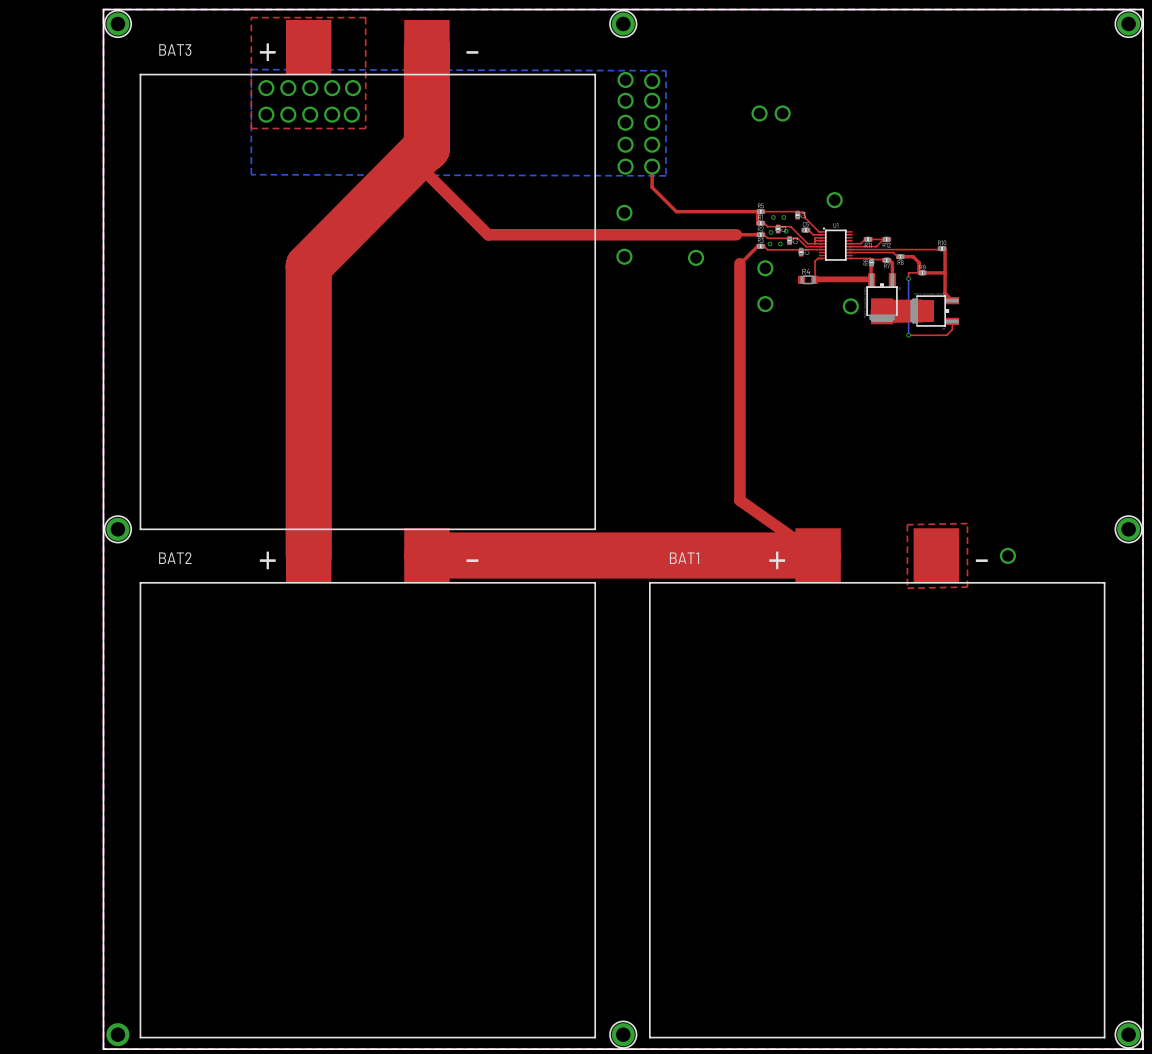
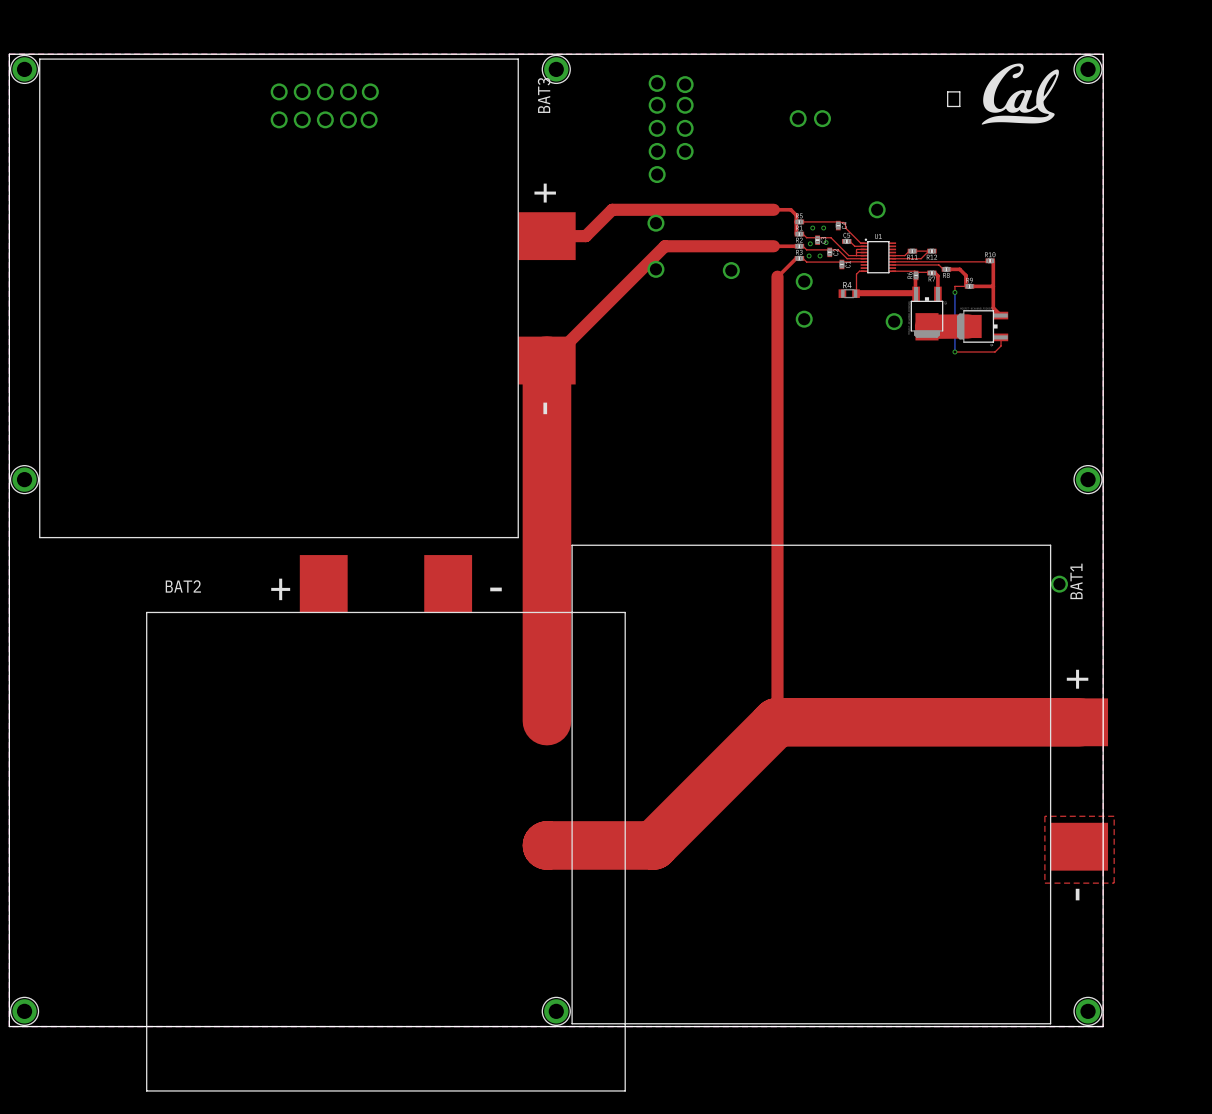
board edge: (103, 9) (1143, 9) (1142, 1049) (103, 1049) (103, 9) -> (9, 54) (9, 1026) (1103, 1026) (1103, 54) (9, 54)
top zone outline: (251, 17) (365, 17) (365, 128) (251, 128) (251, 17) -> none
BAT3 footprint: [140, 19, 596, 530] -> [39, 58, 576, 538]
drawing position: (117, 23) -> (24, 69)
via: (117, 23) -> none
drawing position: (623, 23) -> (556, 69)
via: (623, 23) -> none
drawing position: (1128, 23) -> (1088, 69)
via: (1128, 23) -> none
top track: (426, 47) (426, 148) (423, 150) -> none
BAT3 name position: BAT3 (175, 50) -> BAT3 (544, 95)
drawing: none -> [981, 63, 1059, 125]
via: none -> (24, 69)
via: none -> (556, 69)
via: none -> (1088, 69)
bottom zone outline: (251, 69) (666, 70) (666, 175) (251, 174) (251, 69) -> none
line: none -> (947, 91) (947, 106) (959, 106) (959, 91) (947, 91)
top track: (423, 150) (415, 158) (415, 162) (488, 234) (632, 234) -> (546, 364) (664, 246)
top track: (423, 150) (308, 266) (308, 555) -> none
top track: (652, 166) (652, 187) (676, 211) (757, 211) -> (546, 236) (585, 236) (612, 209) (790, 209) (796, 215) (796, 221)
via: (652, 166) -> none
top track: none -> (546, 360) (546, 721)
drawing: none -> [9, 465, 40, 495]
drawing: none -> [1073, 465, 1103, 495]
via: none -> (24, 479)
via: none -> (1088, 479)
top track: (739, 500) (818, 555) (426, 555) -> (777, 525) (777, 721) (774, 724)
drawing: [104, 515, 132, 544] -> none
drawing: [1114, 515, 1143, 544] -> none
top zone outline: (967, 523) (967, 587) (907, 588) (907, 524) (967, 523) -> none
BAT1 footprint: [649, 528, 1105, 1038] -> [571, 544, 1109, 1025]
via: (117, 529) -> none
via: (1128, 529) -> none
BAT1 name position: BAT1 (684, 558) -> BAT1 (1076, 581)
top track: none -> (1079, 722) (776, 722) (653, 845) (547, 845)
top zone outline: none -> (1044, 816) (1044, 883) (1114, 883) (1114, 816) (1044, 816)
drawing: none -> [9, 996, 40, 1026]
drawing: none -> [541, 996, 571, 1026]
drawing: none -> [1073, 996, 1103, 1026]
via: none -> (24, 1011)
via: none -> (556, 1011)
via: none -> (1088, 1011)
drawing: [609, 1020, 638, 1049] -> none
drawing: [1114, 1020, 1143, 1049] -> none
via: (117, 1034) -> none
via: (623, 1034) -> none
via: (1128, 1034) -> none

